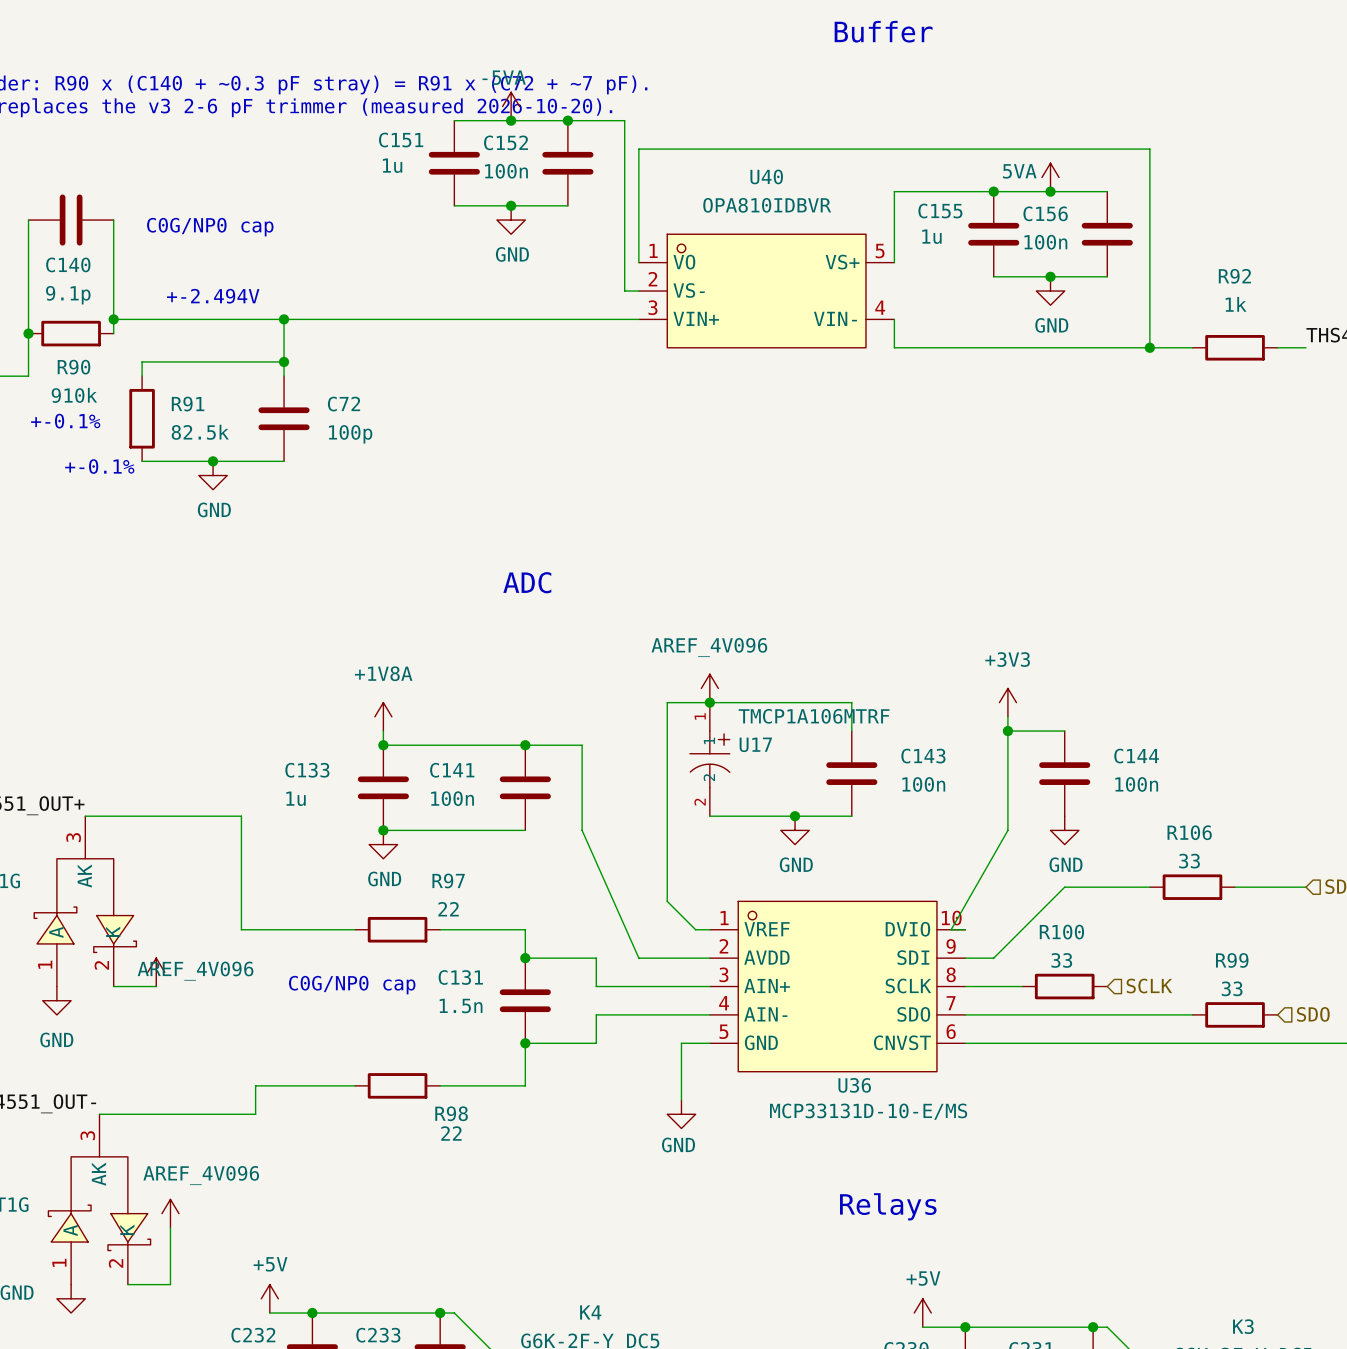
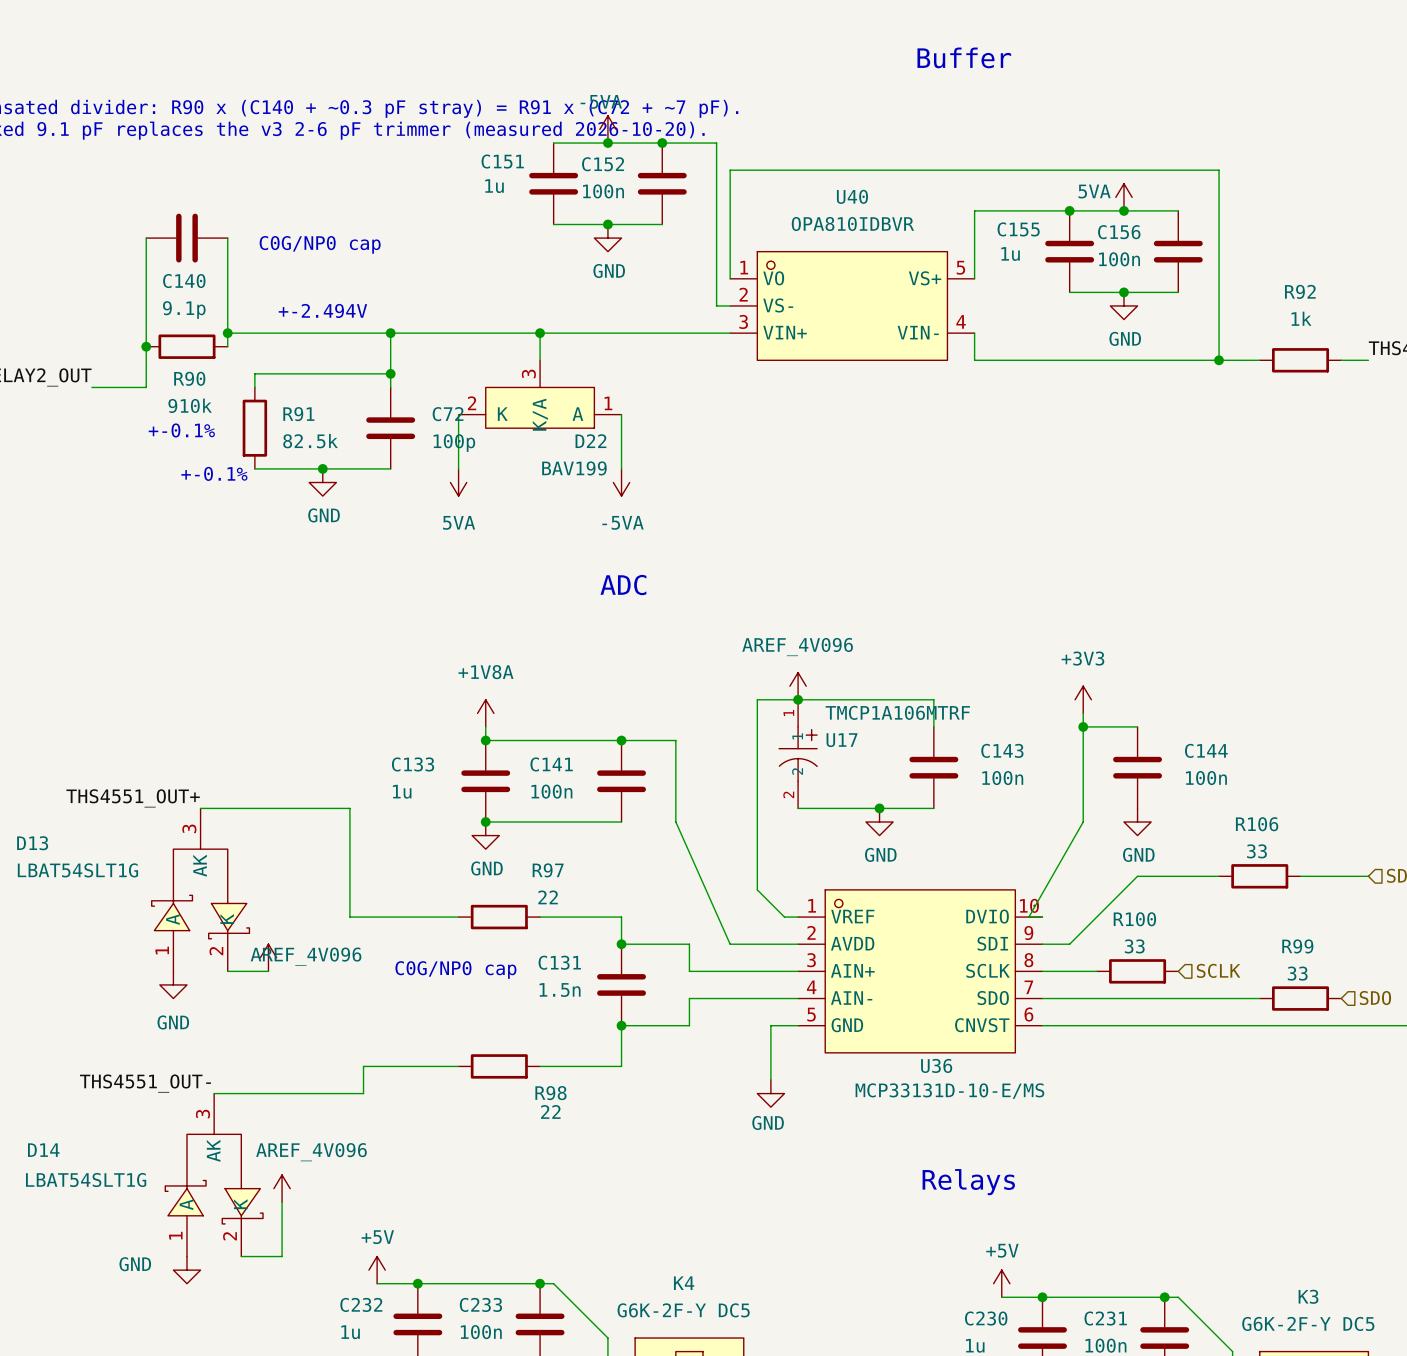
wire: none -> (540, 333) (540, 360)
junction: none -> (540, 333)
D22: none -> BAV199 (540, 394)
wire: none -> (458, 414) (458, 468)
wire: none -> (621, 414) (621, 468)
power symbol: none -> 5VA (458, 482)
power symbol: none -> -5VA (621, 482)

